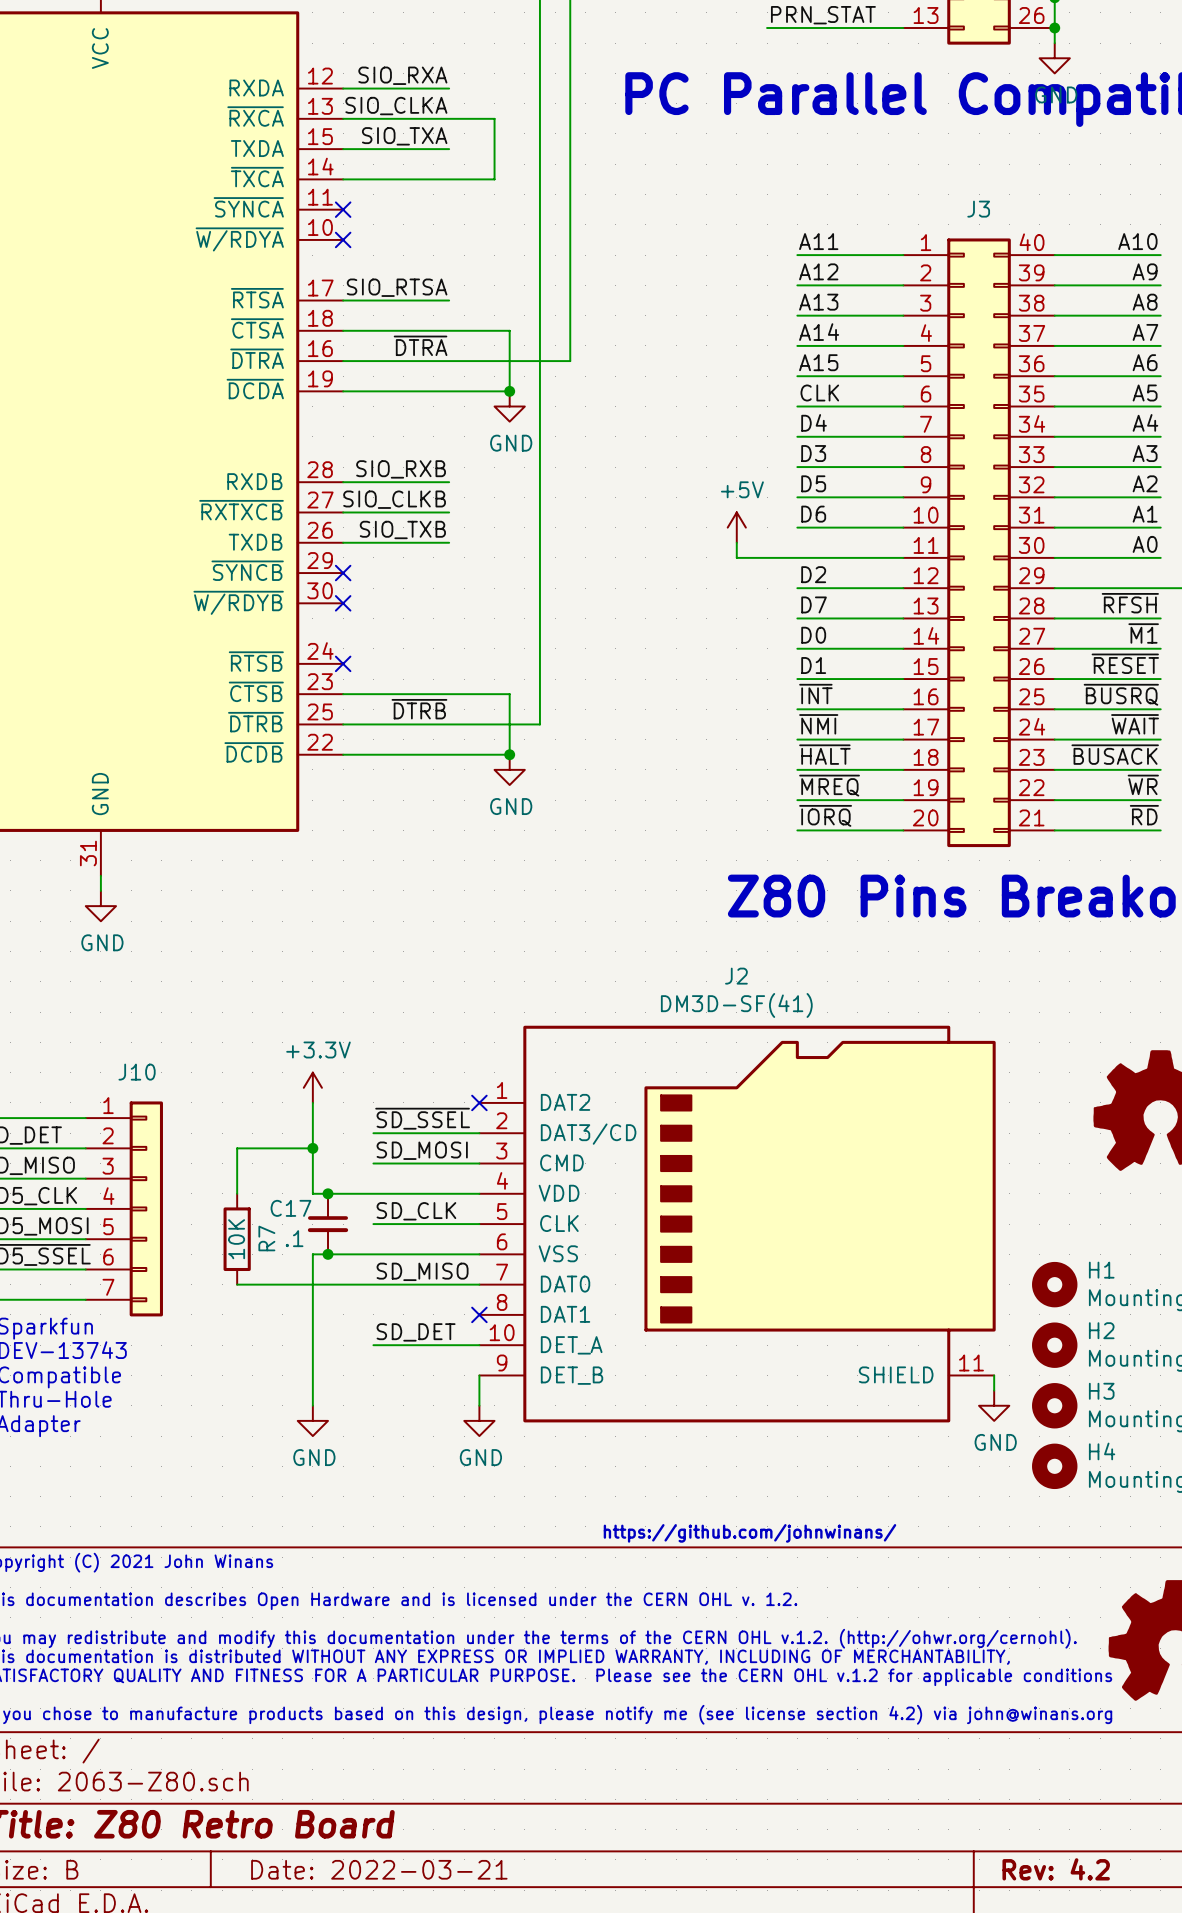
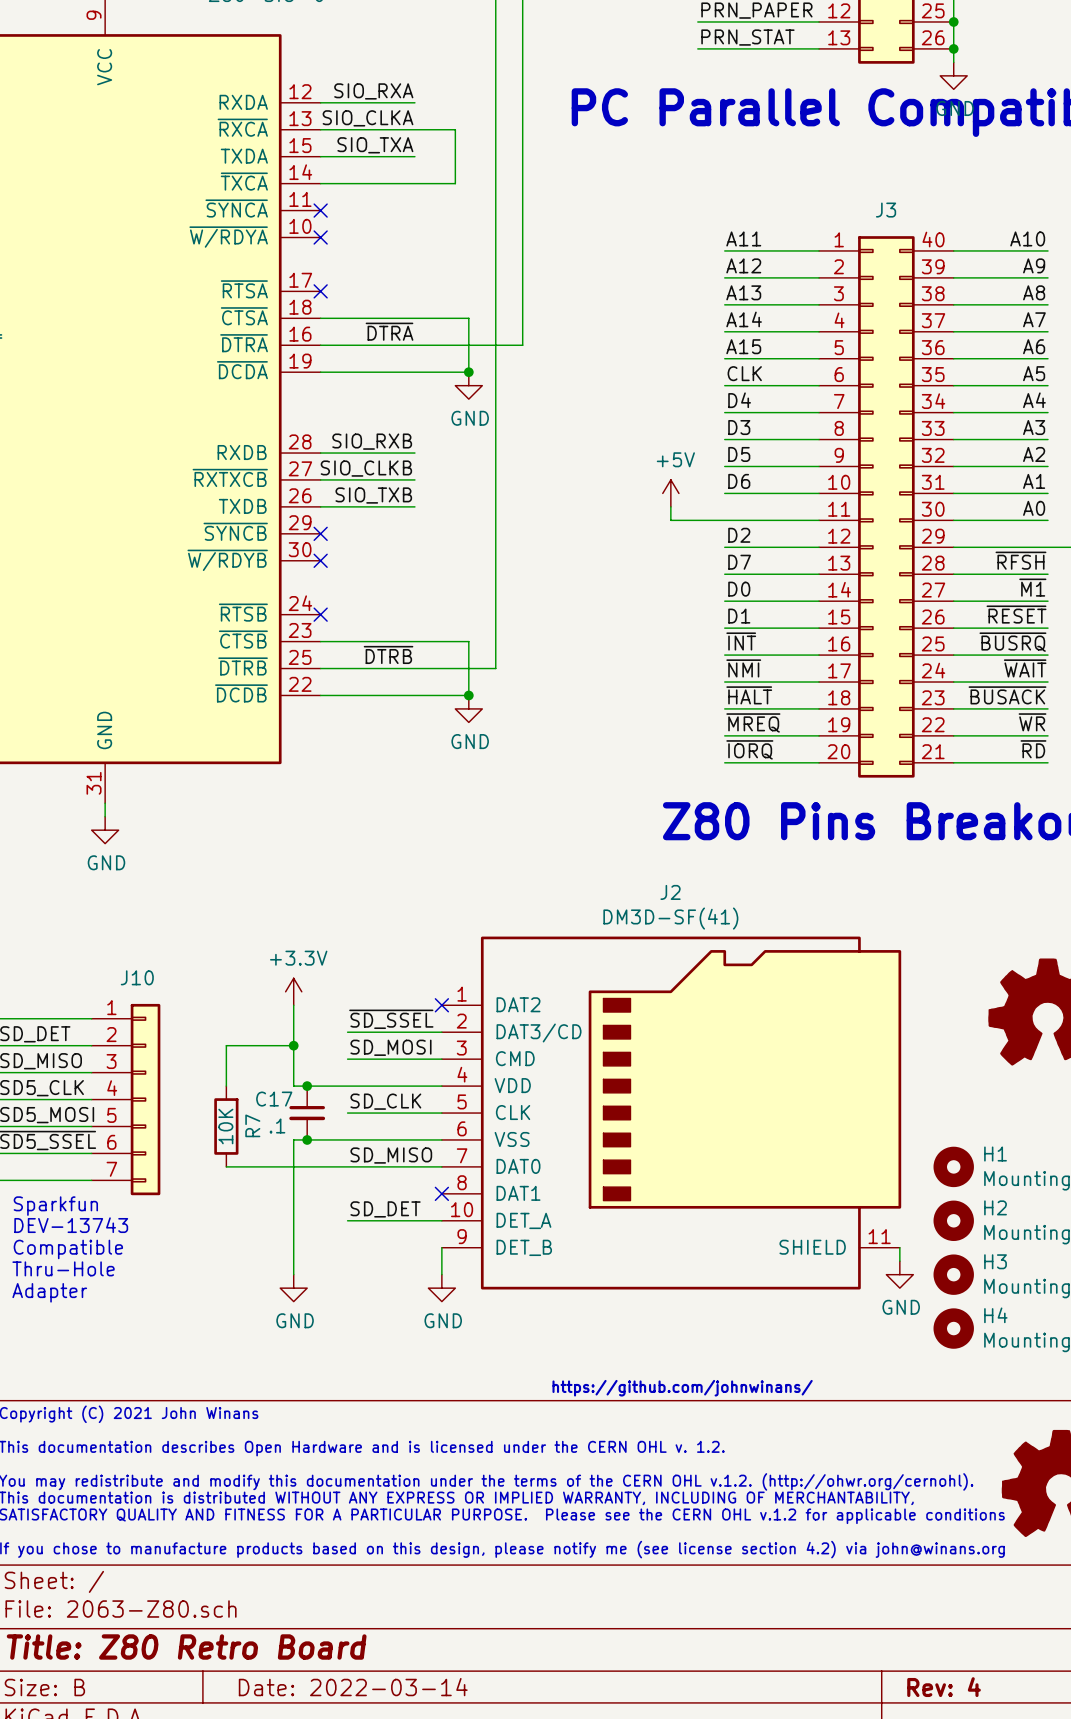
label: SIO_RTSA (397, 287) -> none
wire: (343, 300) (449, 300) -> none
no-connect mark: none -> (320, 291)
title block: Date: 2022-03-21 (379, 1869) -> Date: 2022-03-14 (353, 1687)
title block: Rev: 4.2 (1056, 1869) -> Rev: 4 (944, 1687)

